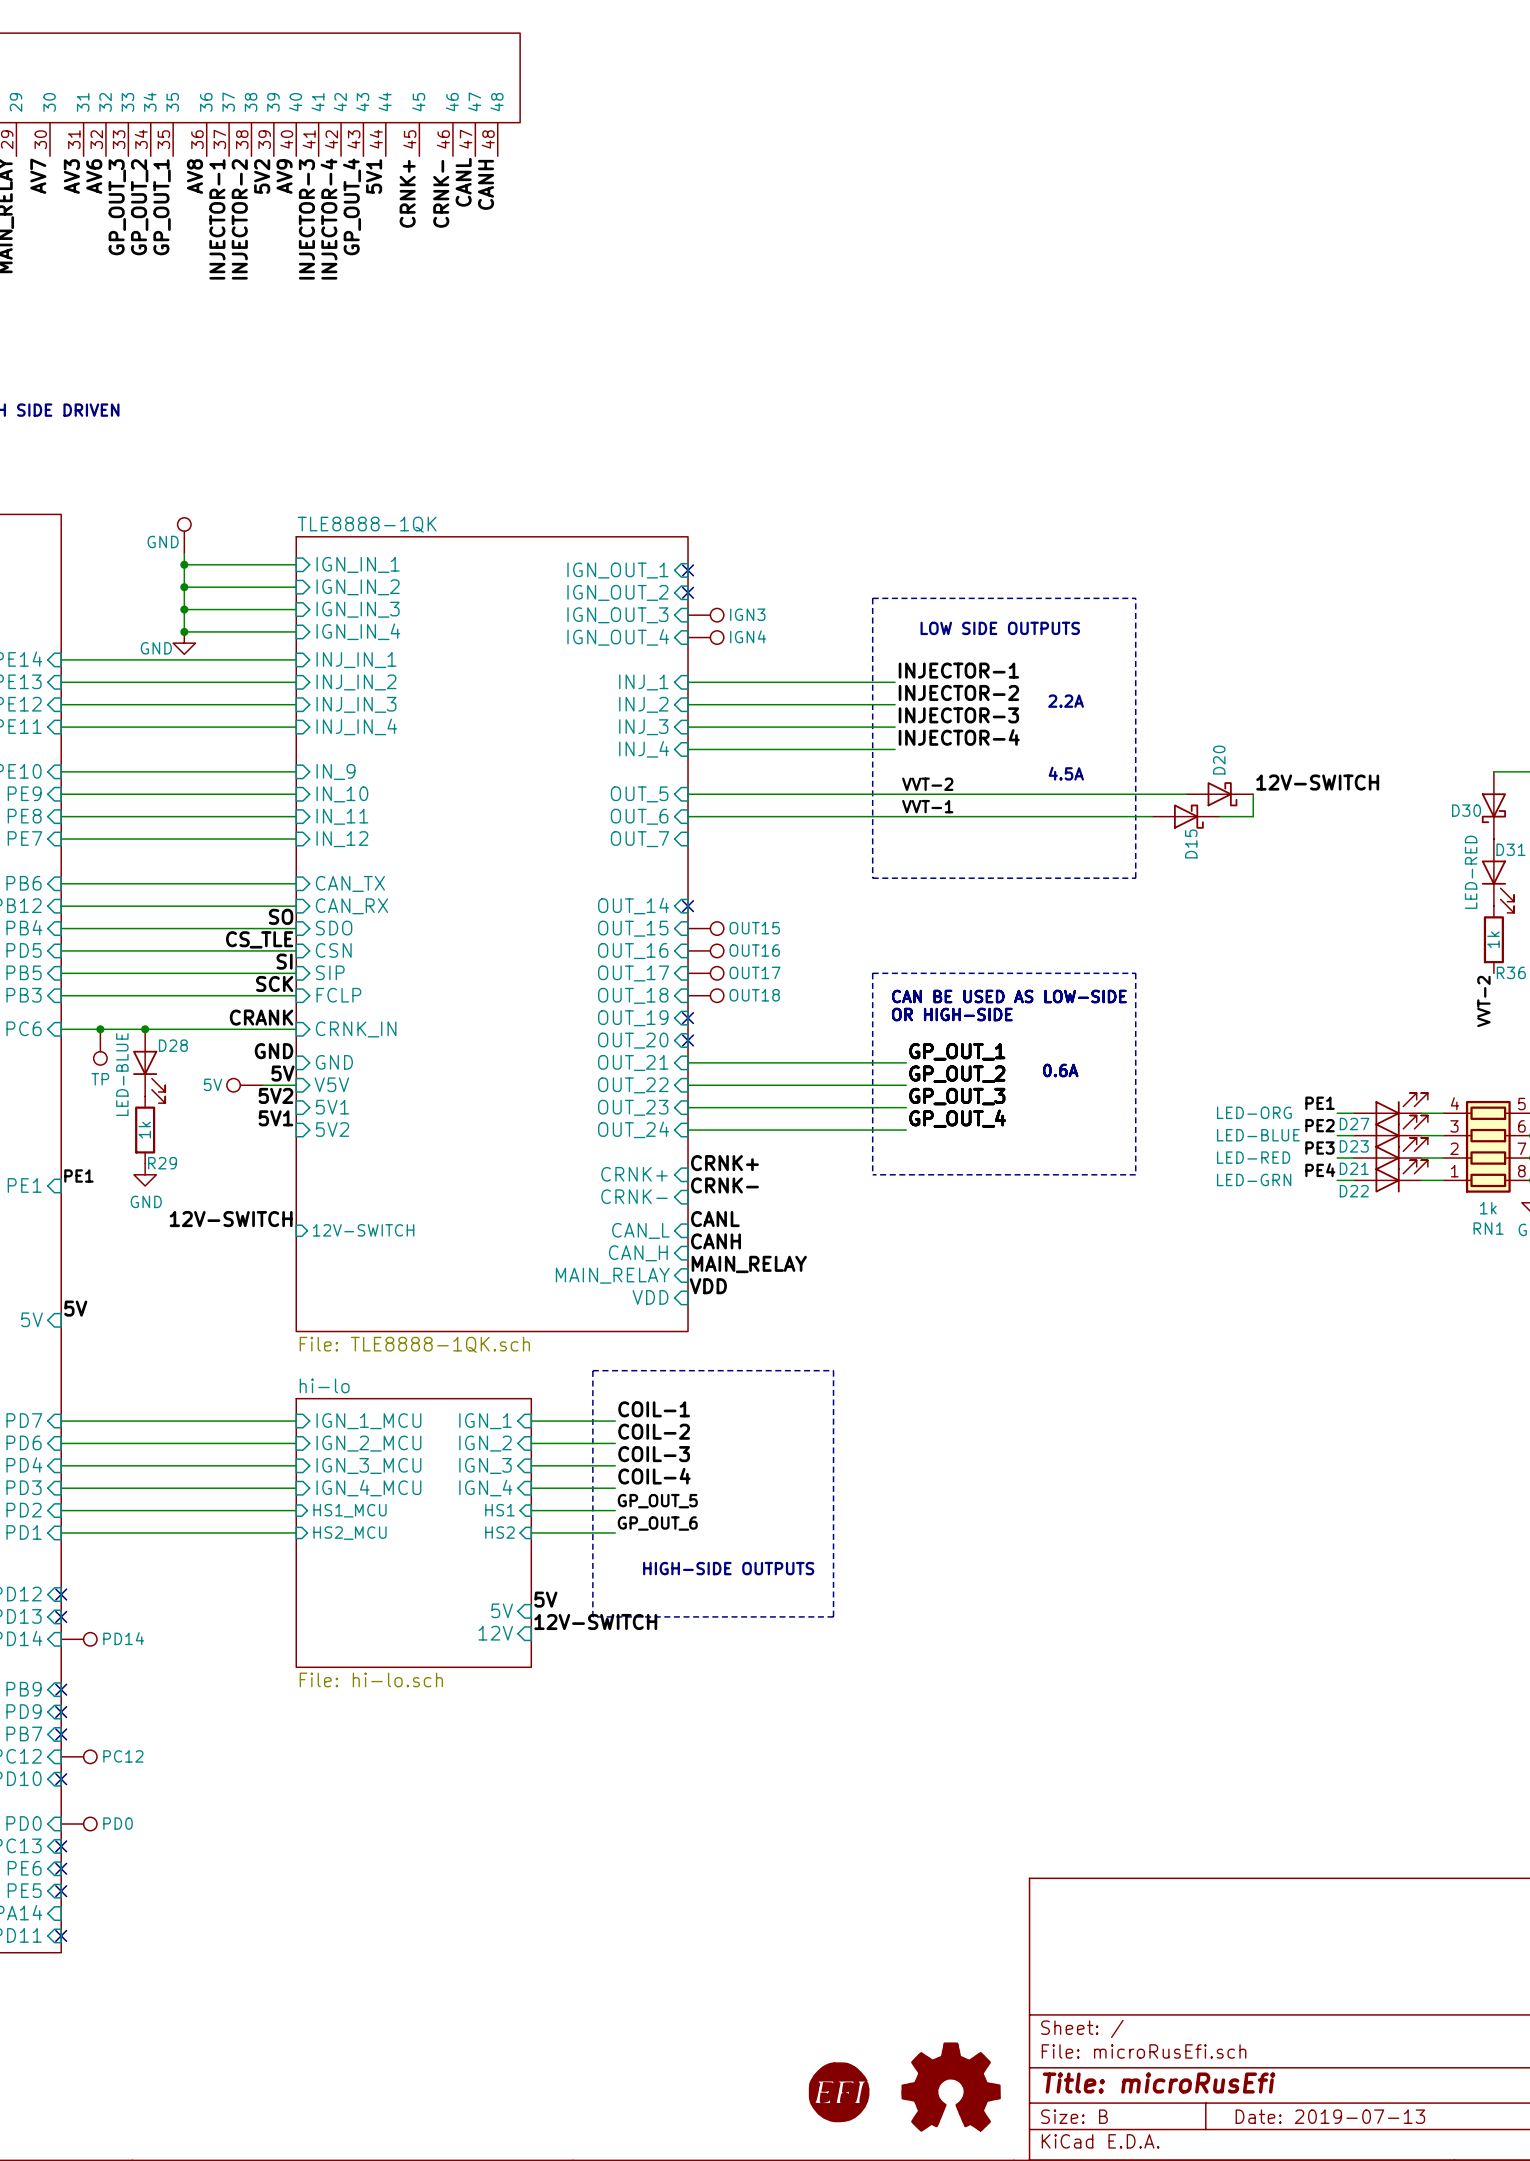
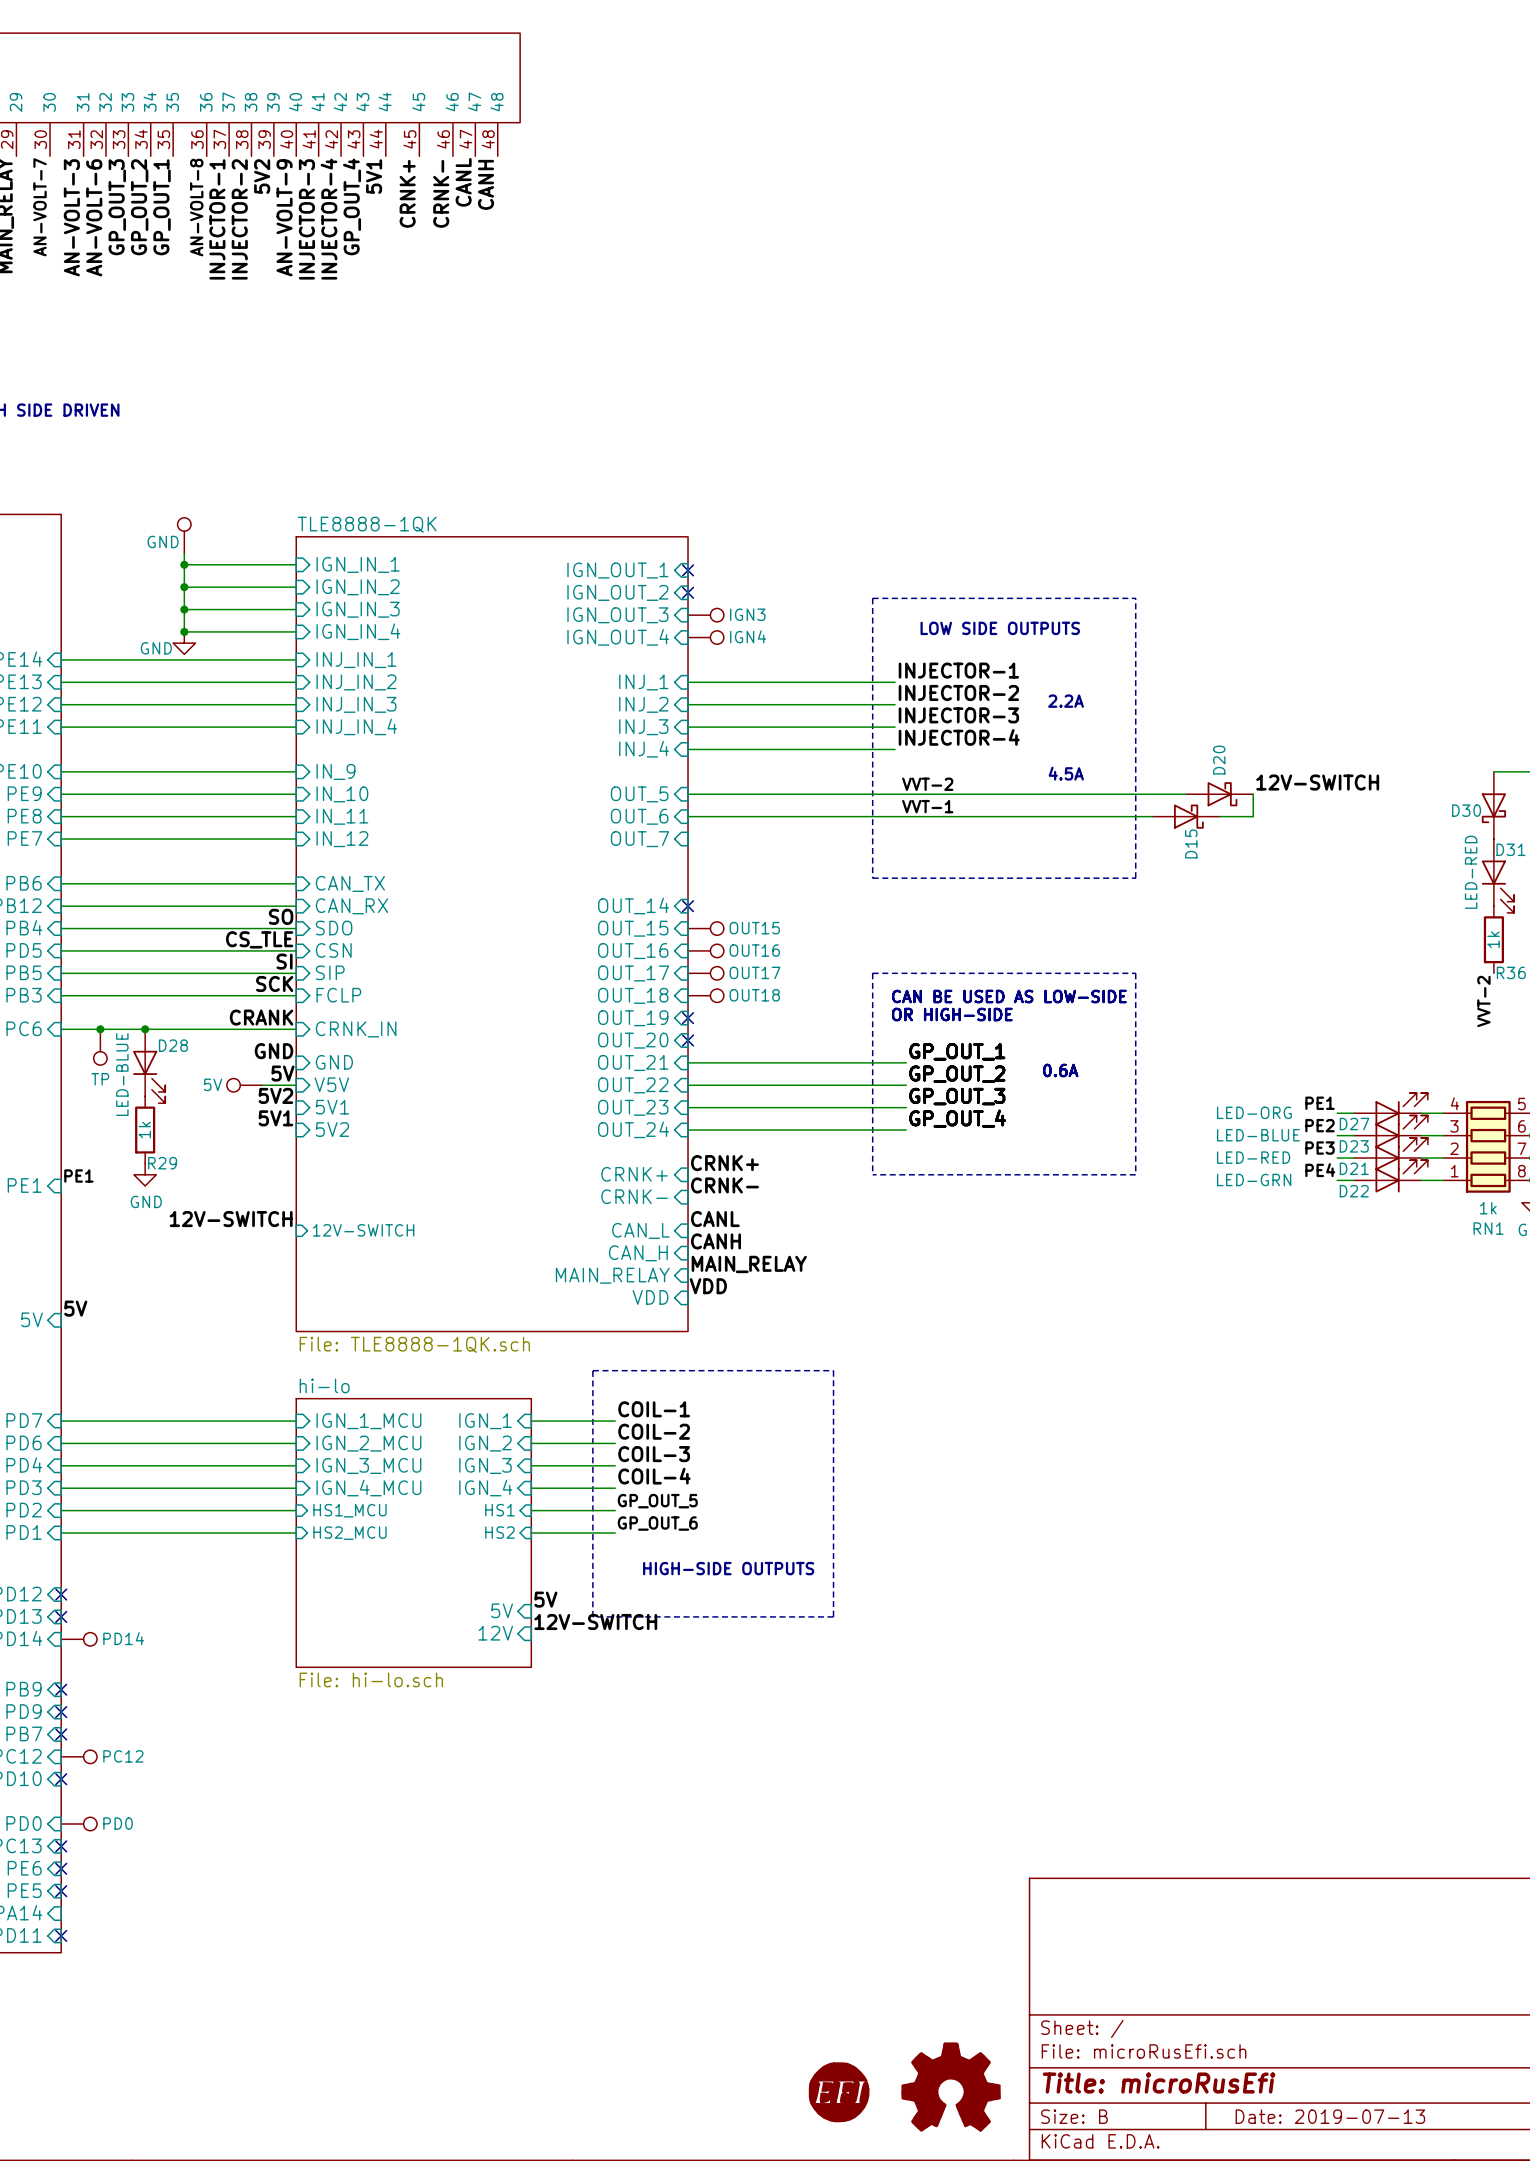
label: AV7 (38, 176) -> AN-VOLT-7 (40, 207)
label: AV3 (71, 176) -> AN-VOLT-3 (71, 217)
label: AV6 (94, 176) -> AN-VOLT-6 (94, 217)
label: AV8 (194, 176) -> AN-VOLT-8 (196, 207)
label: AV9 (284, 176) -> AN-VOLT-9 (284, 217)

